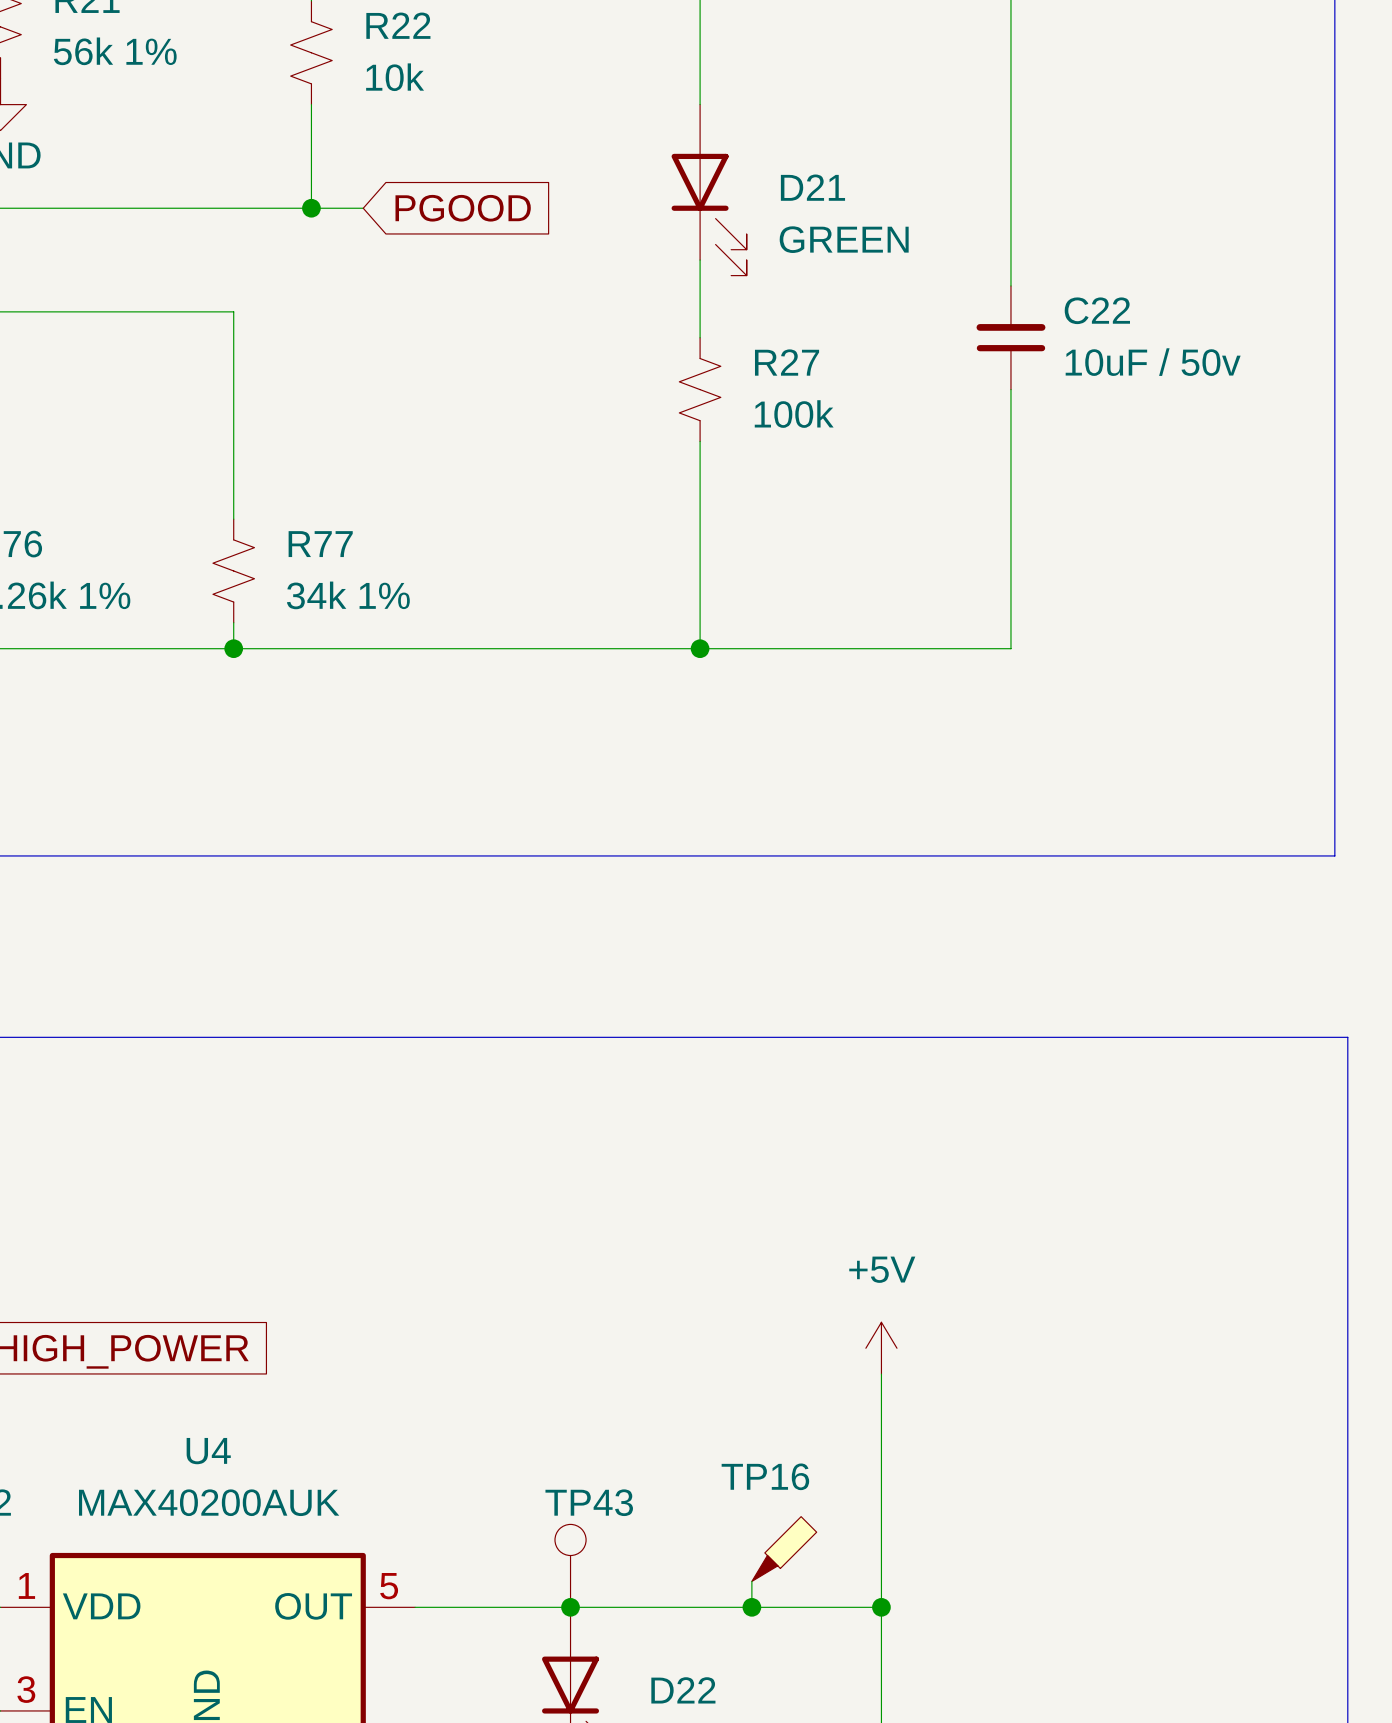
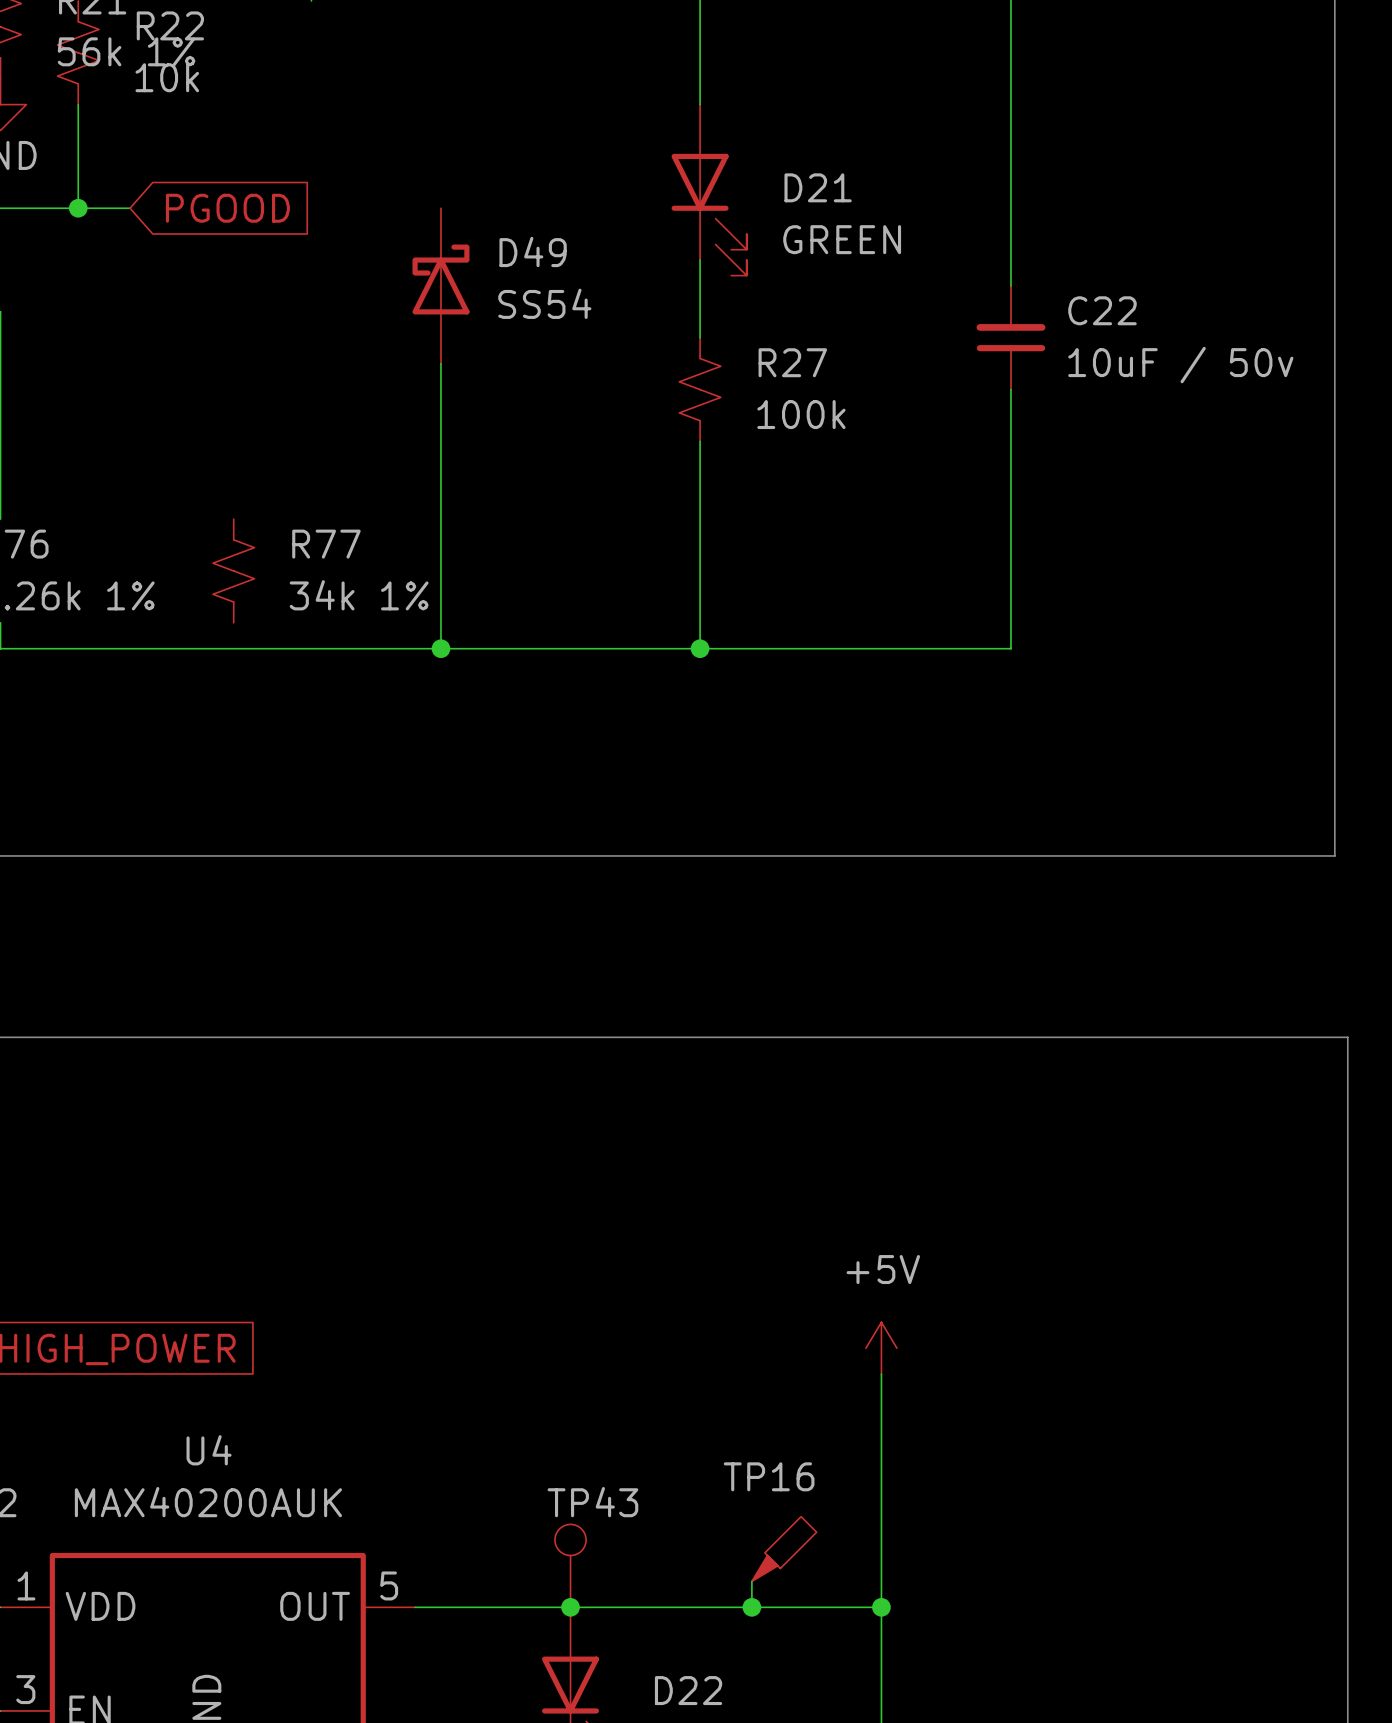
R22 position: (311, 52) -> (78, 52)
wire: (311, 104) (311, 208) -> (78, 104) (78, 208)
junction: none -> (78, 208)
wire: (130, 208) (363, 208) -> none
junction: (311, 208) -> none
global label position: PGOOD (463, 208) -> PGOOD (227, 208)
D49: none -> SS54 (440, 285)
wire: (0, 311) (233, 311) (233, 519) -> (0, 311) (0, 519)
wire: none -> (440, 363) (440, 648)
wire: (233, 622) (233, 648) -> (0, 622) (0, 648)
junction: (233, 648) -> none
junction: none -> (440, 648)

